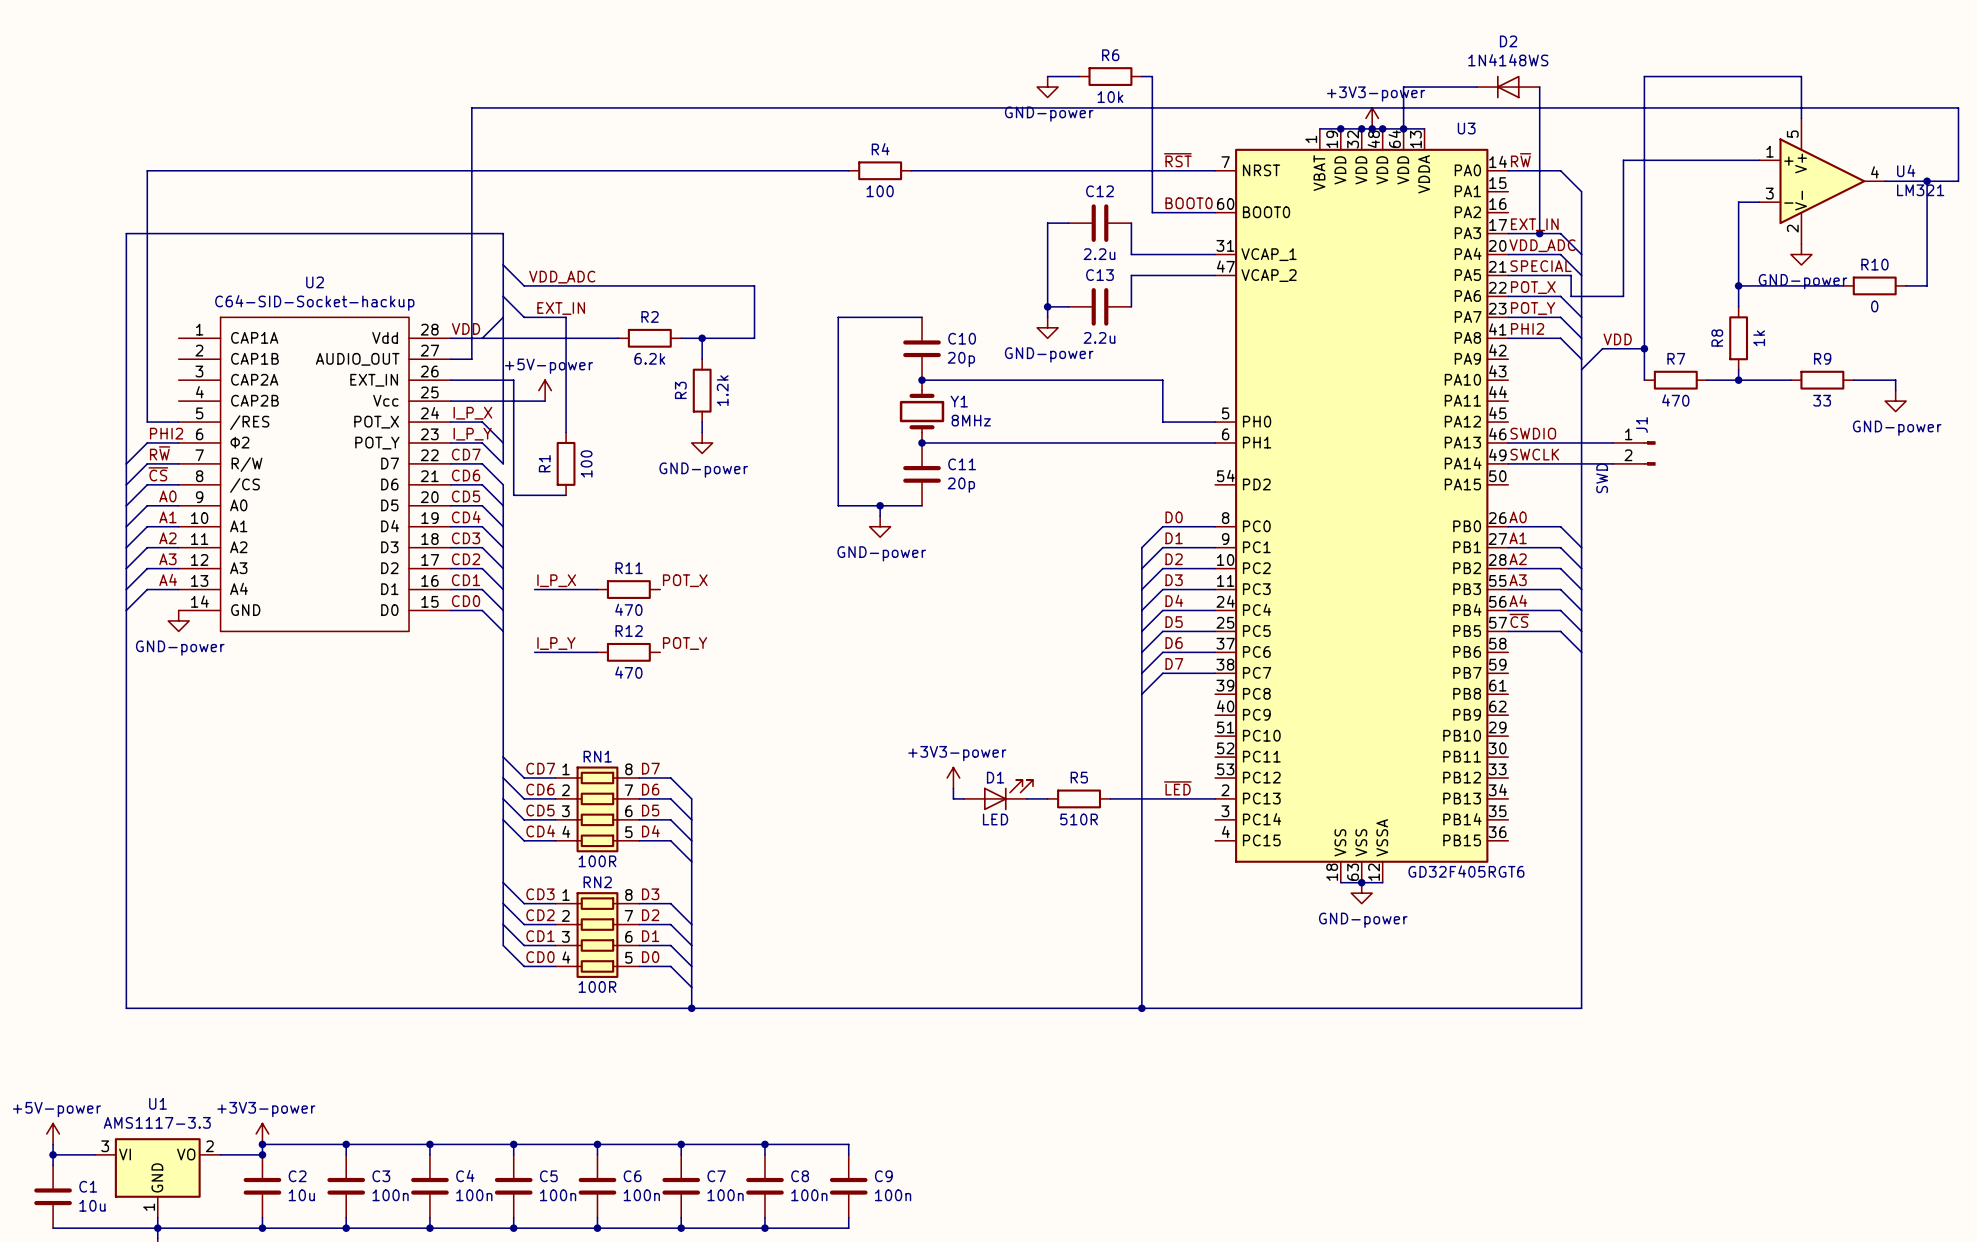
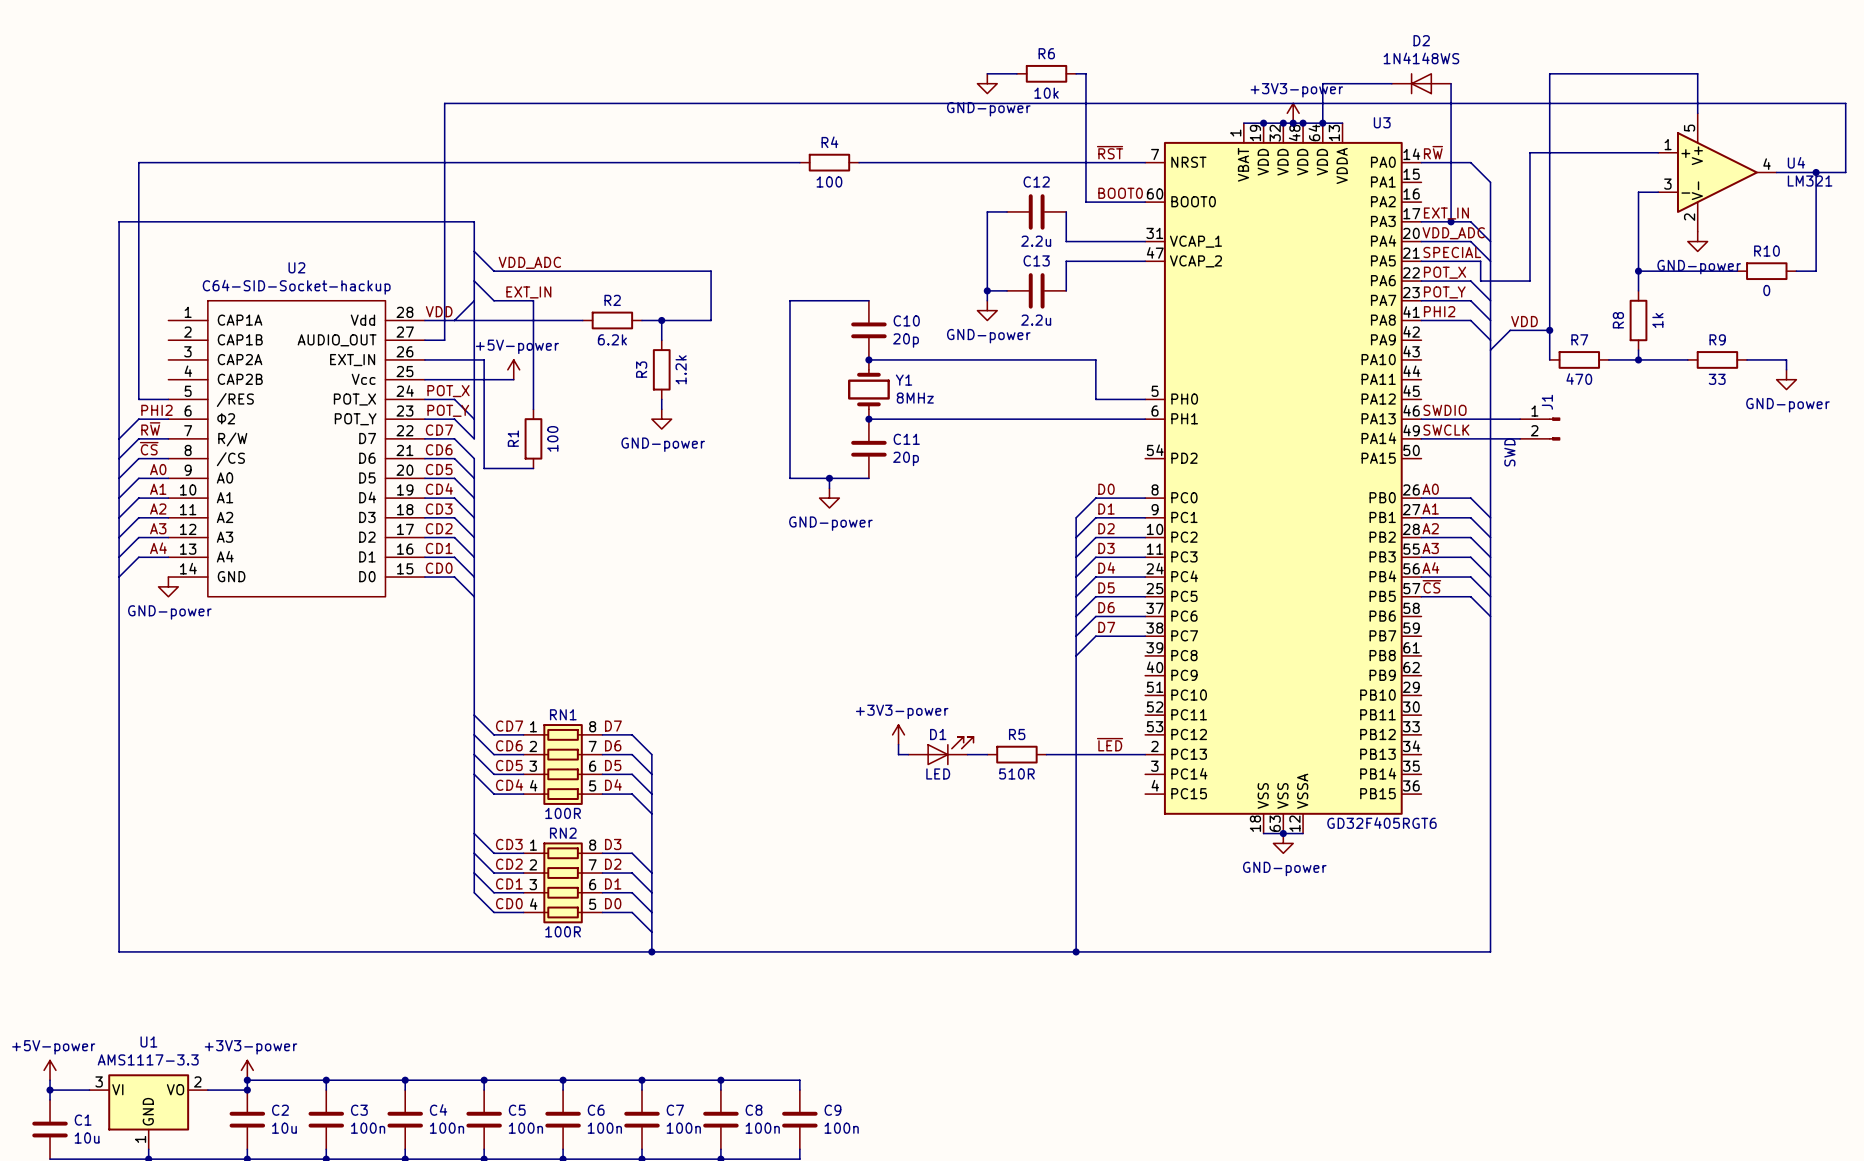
label: I_P_X (472, 413) -> POT_X (448, 391)
label: I_P_Y (472, 434) -> POT_Y (448, 410)
label: I_P_X (556, 580) -> none
label: POT_X (685, 580) -> none
wire: (534, 589) (597, 589) -> none
R11: 470 (628, 589) -> none
label: I_P_Y (556, 643) -> none
label: POT_Y (685, 643) -> none
wire: (534, 652) (597, 652) -> none
R12: 470 (628, 652) -> none

